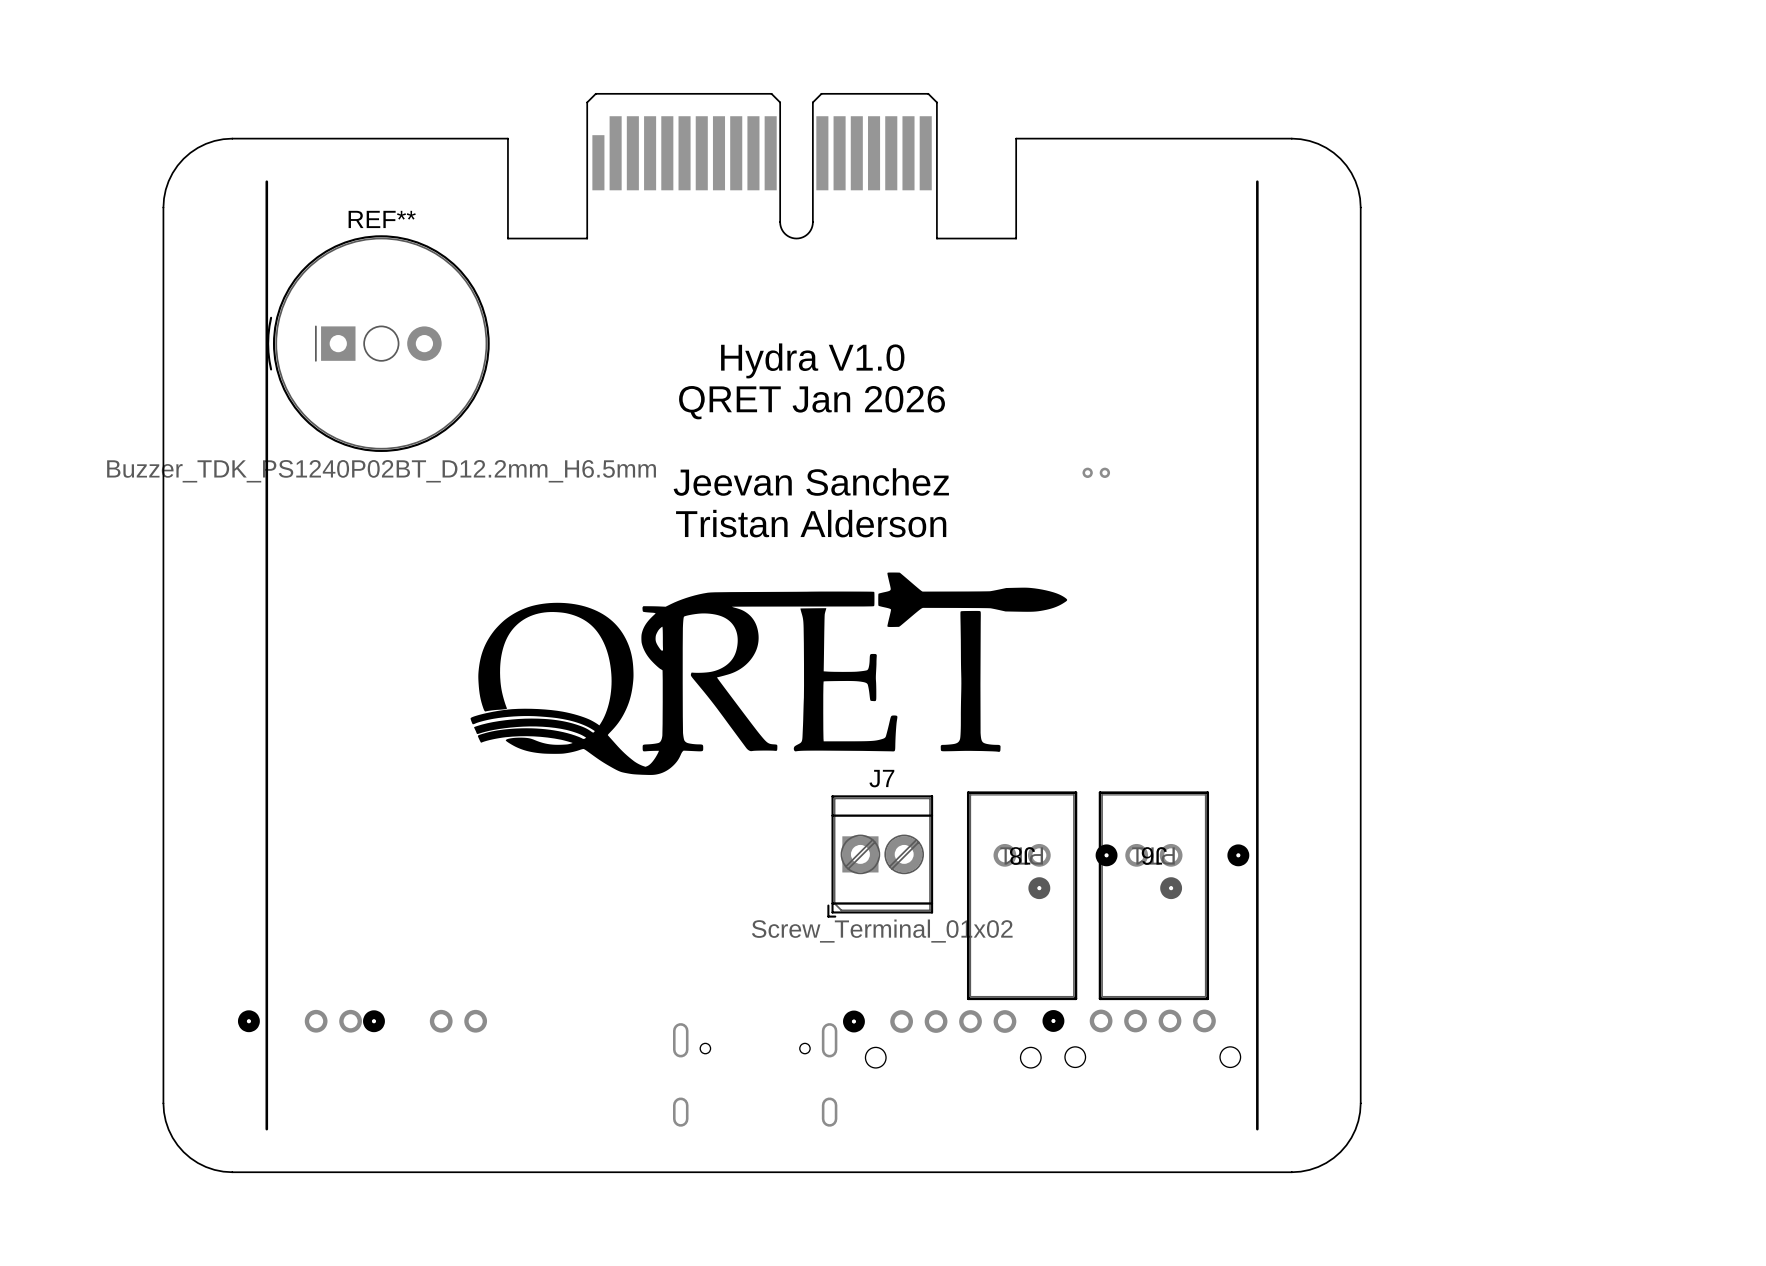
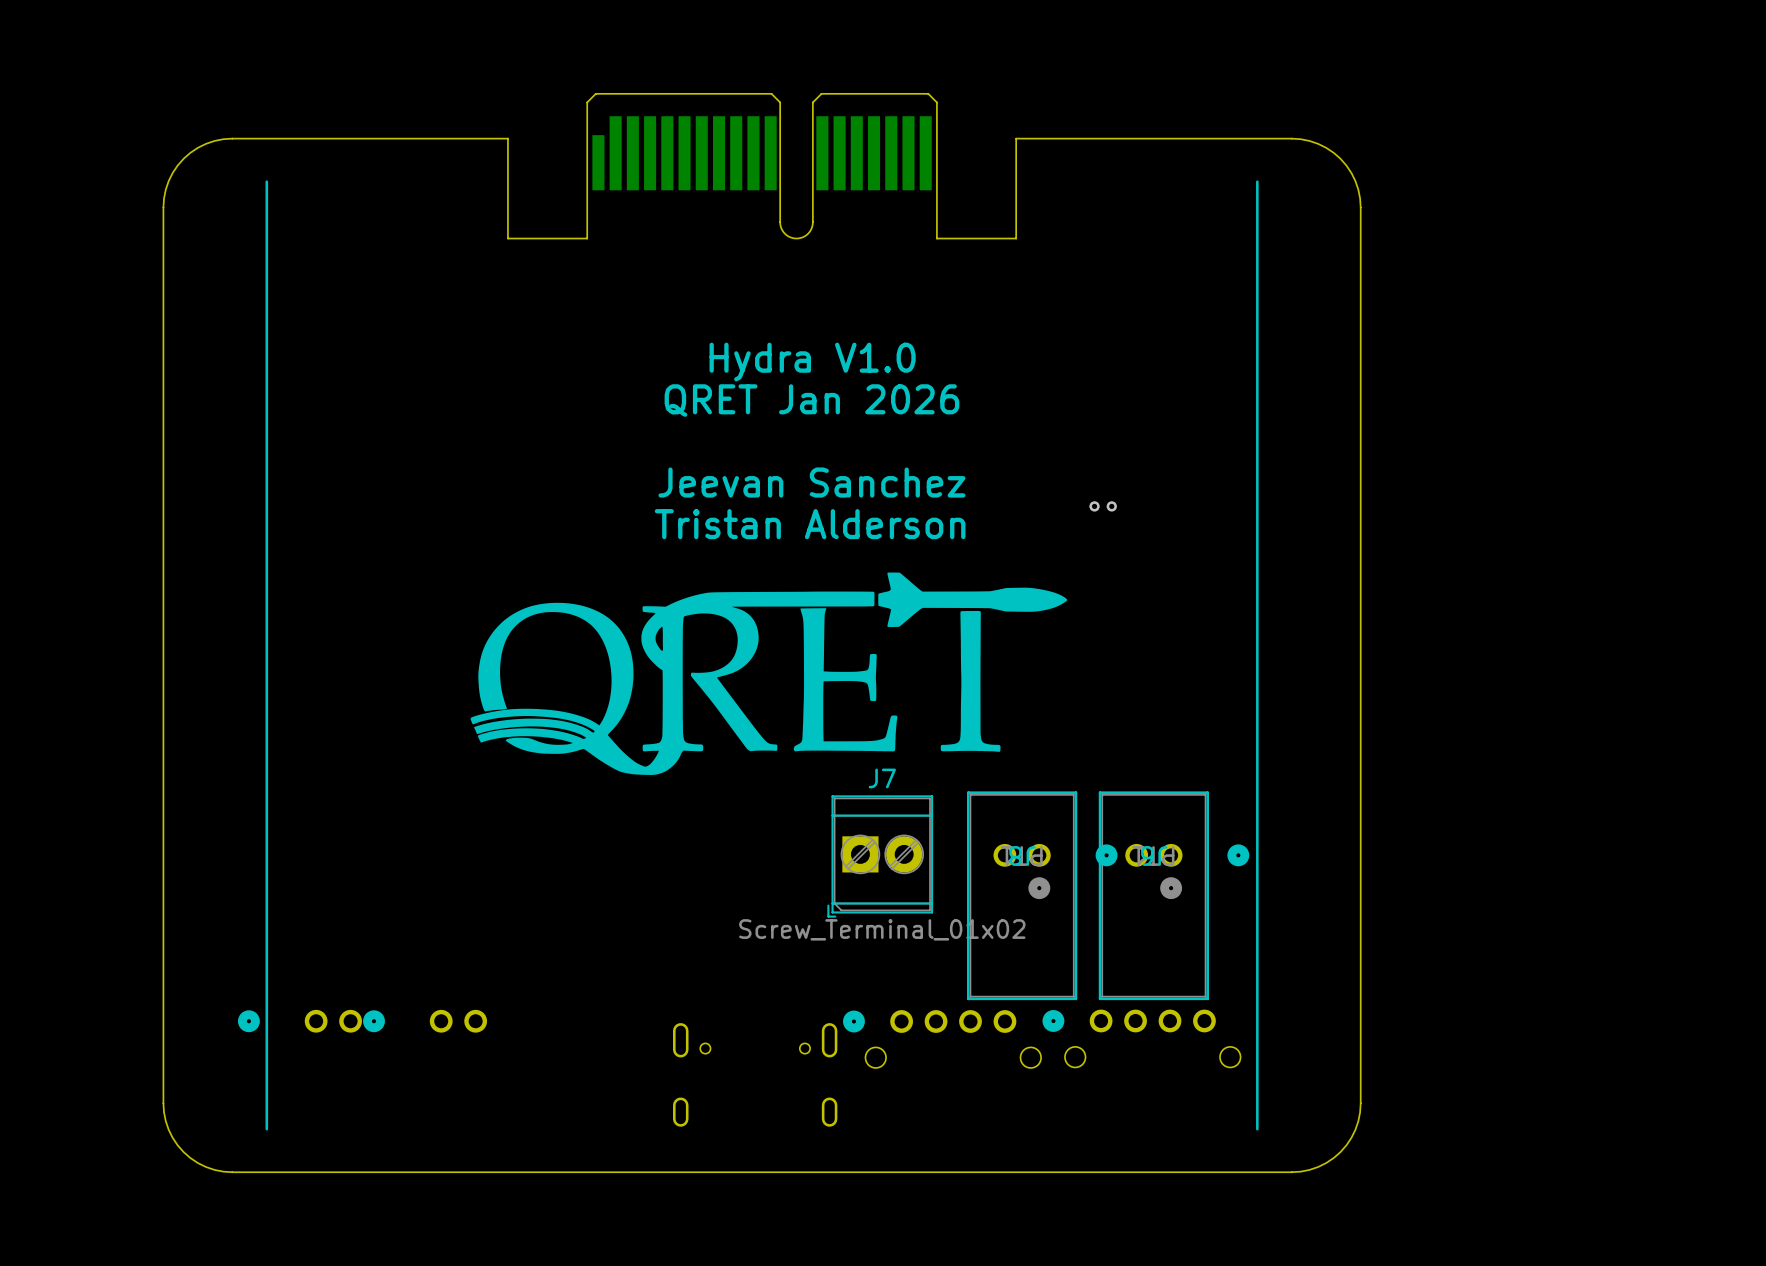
REF**: Buzzer_TDK_PS1240P02BT_D12.2mm_H6.5mm (378, 343) -> none
via: (1087, 472) -> none
via: (1104, 472) -> none
via: none -> (1094, 506)
via: none -> (1111, 506)

